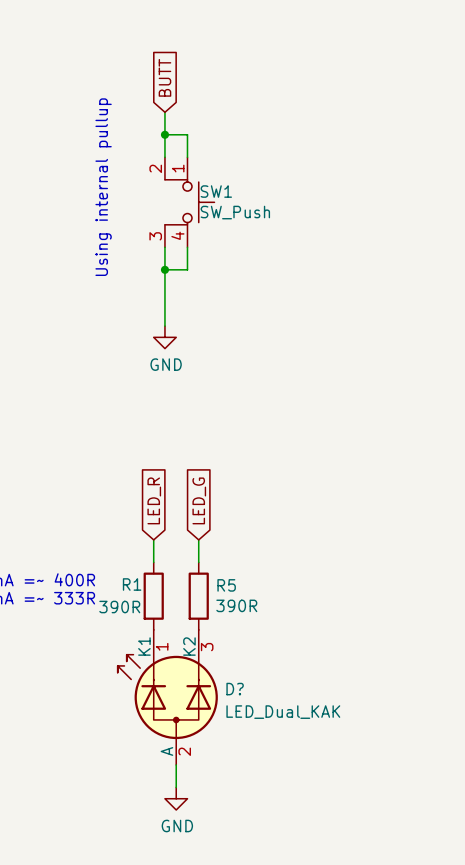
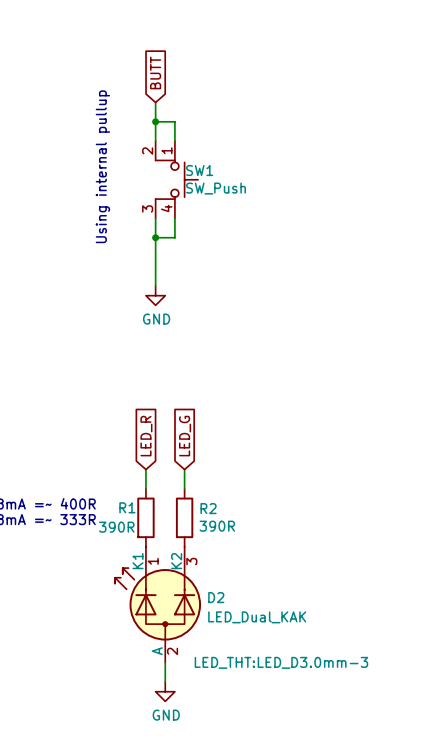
R5 name: R5 (226, 585) -> R2 (208, 508)
D? name: D? (235, 689) -> D2 (216, 597)
D? text: none -> LED_THT:LED_D3.0mm-3 (281, 662)

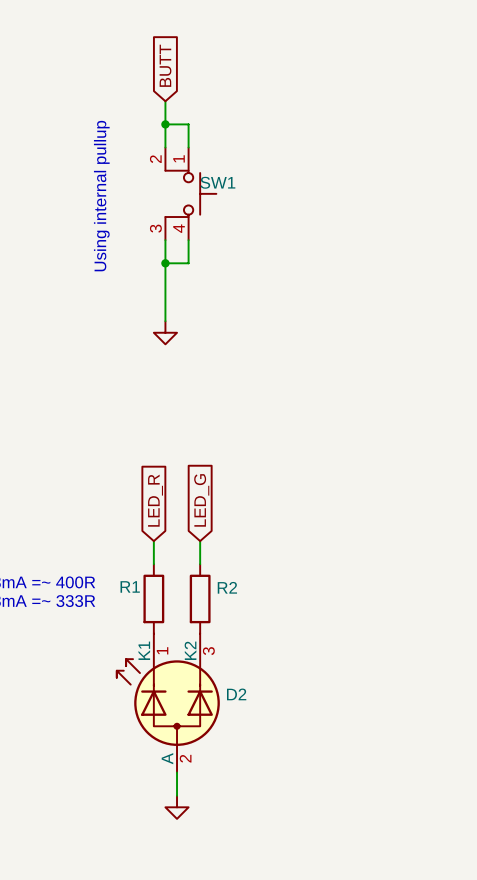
SW1 value: SW_Push (216, 188) -> none
power symbol text: GND (156, 319) -> none
R2 value: 390R (217, 526) -> none
R1 value: 390R (116, 527) -> none
D2 value: LED_Dual_KAK (257, 617) -> none
D2 text: LED_THT:LED_D3.0mm-3 (281, 662) -> none
power symbol text: GND (166, 715) -> none

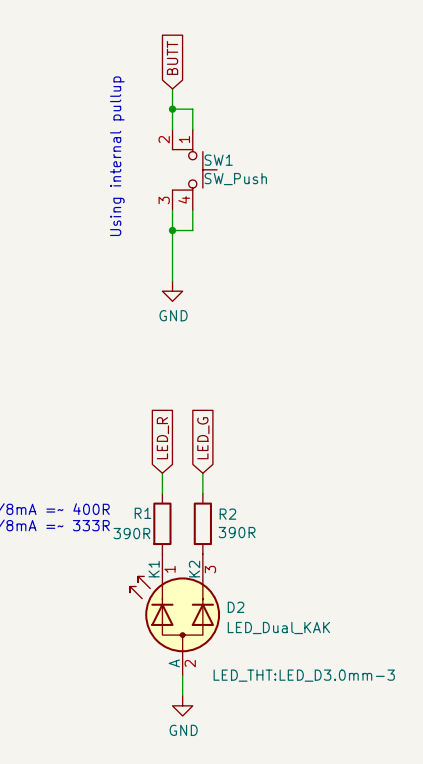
SW1 value: none -> SW_Push (235, 179)
power symbol text: none -> GND (173, 315)
R2 value: none -> 390R (237, 532)
R1 value: none -> 390R (131, 533)
D2 value: none -> LED_Dual_KAK (278, 627)
D2 text: none -> LED_THT:LED_D3.0mm-3 (304, 675)
power symbol text: none -> GND (183, 730)

